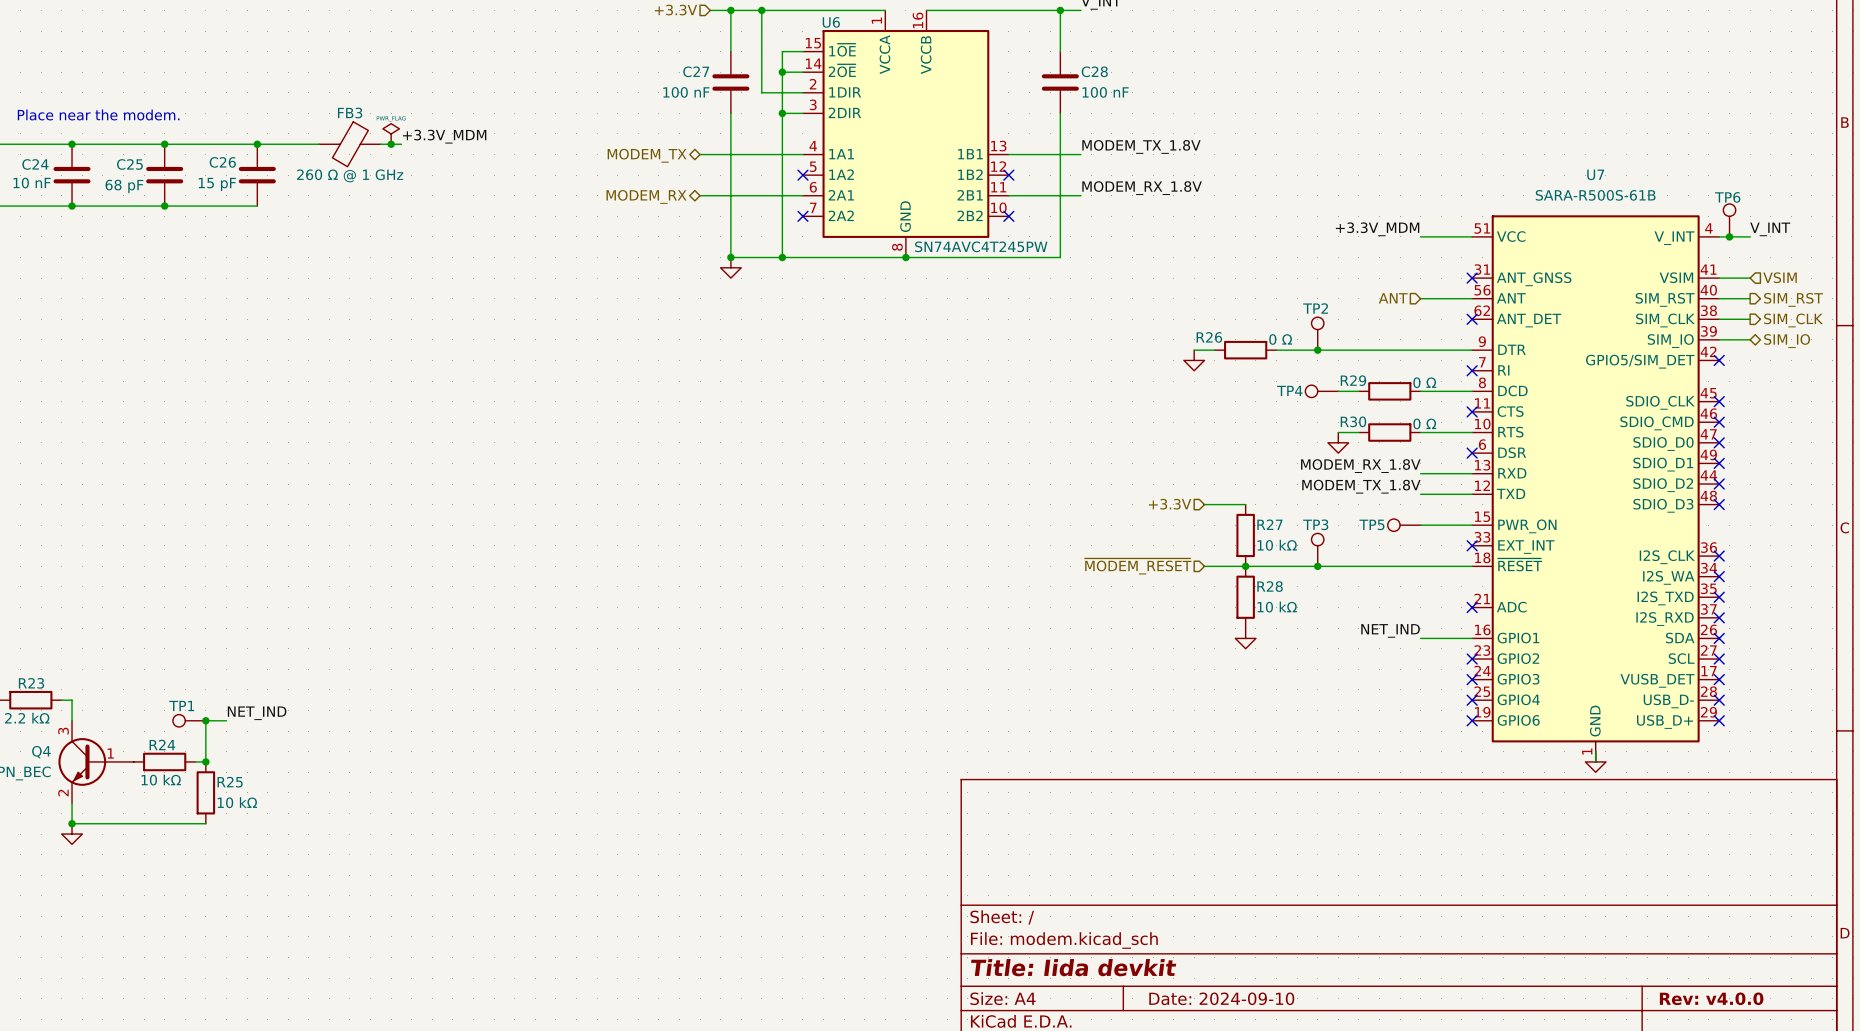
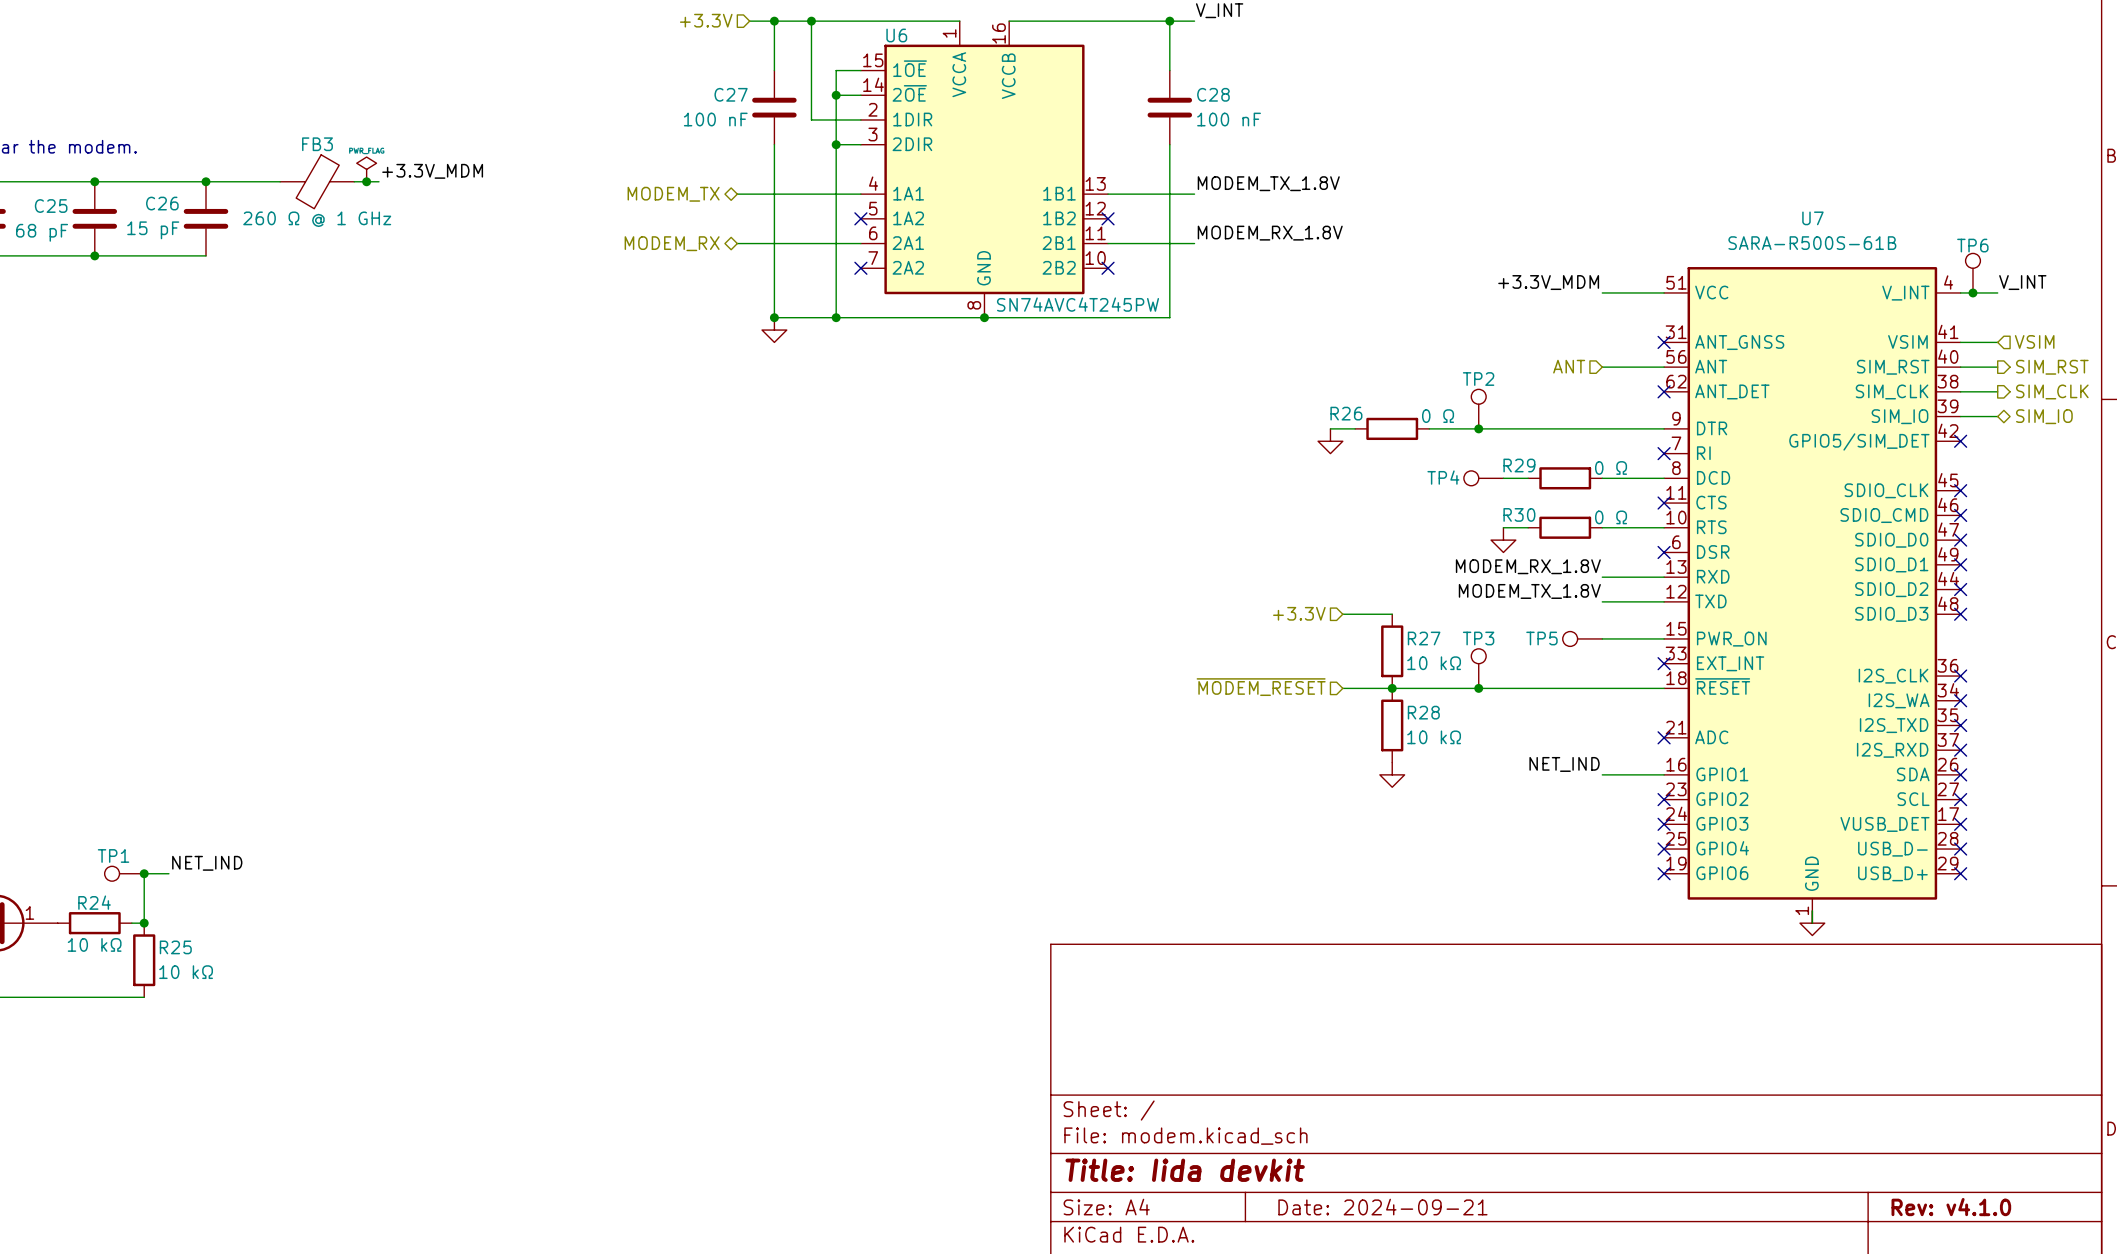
title block: Date: 2024-09-10 (1221, 998) -> Date: 2024-09-21 (1382, 1207)
title block: Rev: v4.0.0 (1711, 998) -> Rev: v4.1.0 (1951, 1207)

